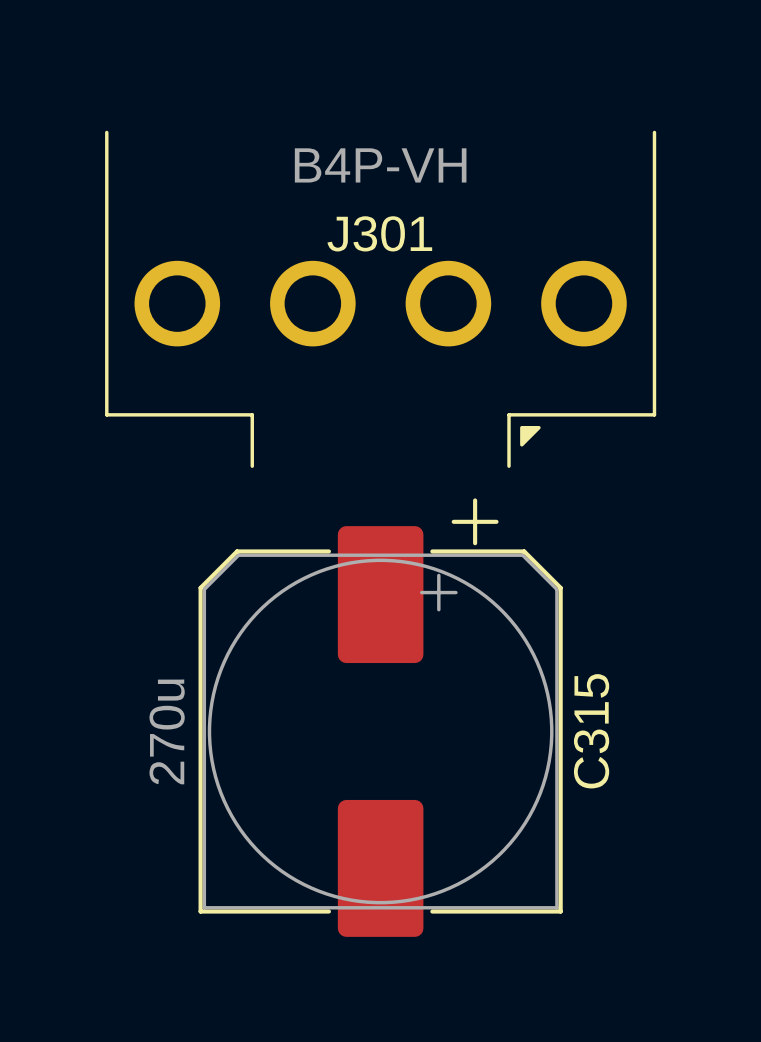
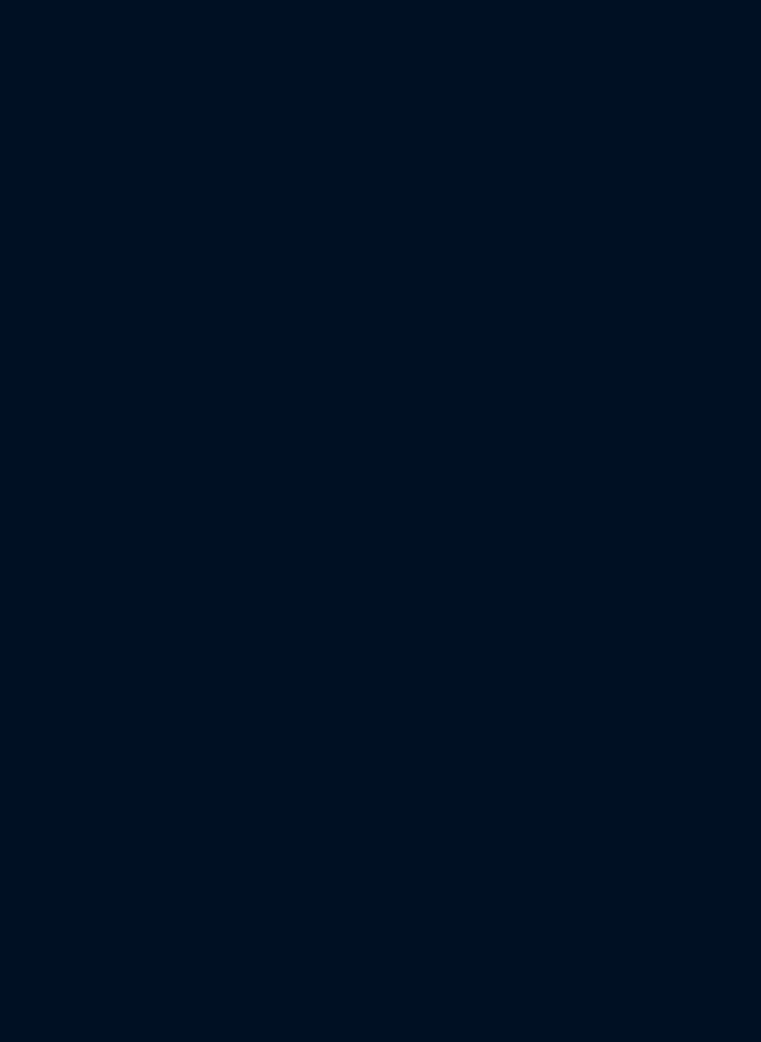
J301: B4P-VH (380, 299) -> none
C315: 270u (380, 717) -> none

